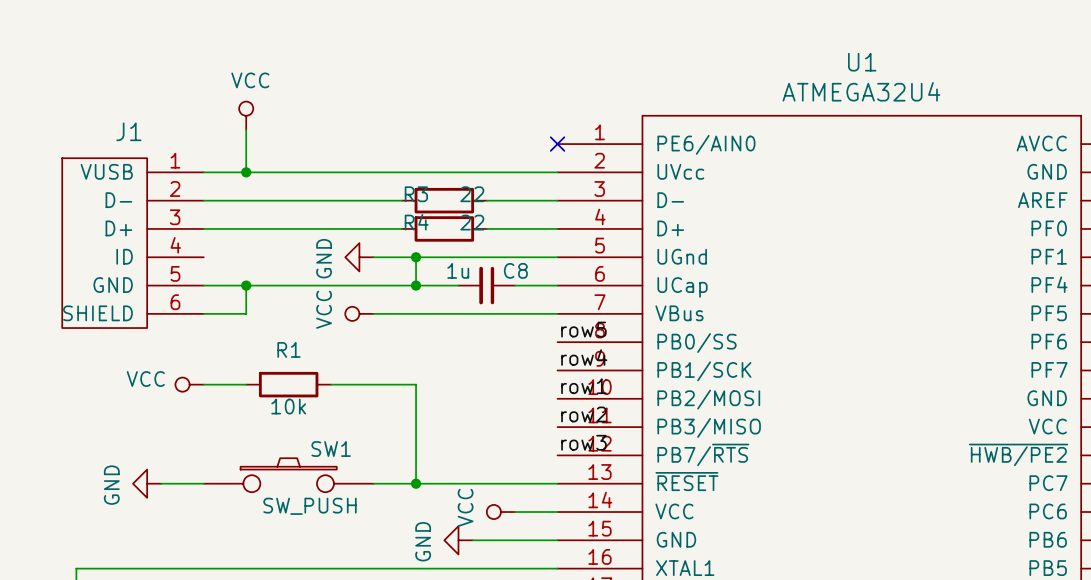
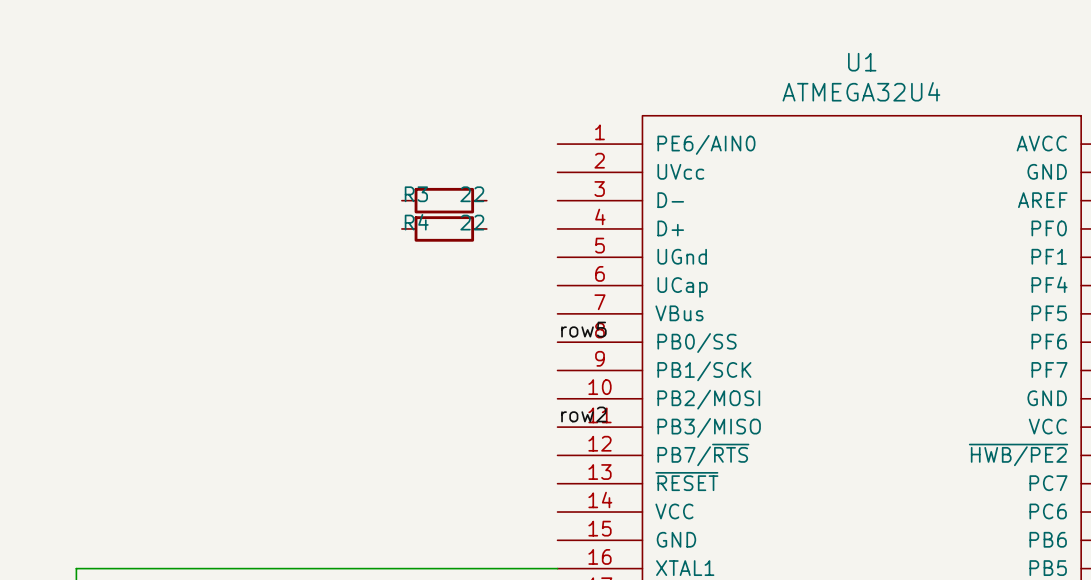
power symbol: VCC (246, 115) -> none
wire: (246, 129) (246, 172) -> none
no-connect mark: (557, 144) -> none
wire: (203, 172) (557, 172) -> none
junction: (246, 172) -> none
wire: (203, 200) (401, 200) -> none
wire: (486, 200) (557, 200) -> none
wire: (203, 228) (401, 228) -> none
wire: (486, 228) (557, 228) -> none
J1: (132, 243) -> none
power symbol: GND (359, 257) -> none
wire: (373, 257) (557, 257) -> none
wire: (416, 257) (416, 285) -> none
junction: (416, 257) -> none
wire: (203, 285) (458, 285) -> none
wire: (246, 285) (246, 313) (203, 313) -> none
junction: (246, 285) -> none
junction: (416, 285) -> none
C8: 1u (486, 285) -> none
wire: (515, 285) (557, 285) -> none
power symbol: VCC (359, 313) -> none
wire: (373, 313) (557, 313) -> none
label: row4 (584, 357) -> none
power symbol: VCC (189, 384) -> none
wire: (203, 384) (246, 384) -> none
R1: 10k (288, 384) -> none
wire: (331, 384) (416, 384) (416, 483) -> none
label: row1 (583, 386) -> none
label: row3 (583, 442) -> none
SW1: SW_PUSH (288, 475) -> none
power symbol: GND (147, 483) -> none
wire: (161, 483) (203, 483) -> none
wire: (373, 483) (557, 483) -> none
junction: (416, 483) -> none
power symbol: VCC (500, 512) -> none
wire: (515, 512) (557, 512) -> none
power symbol: GND (458, 540) -> none
wire: (472, 540) (557, 540) -> none

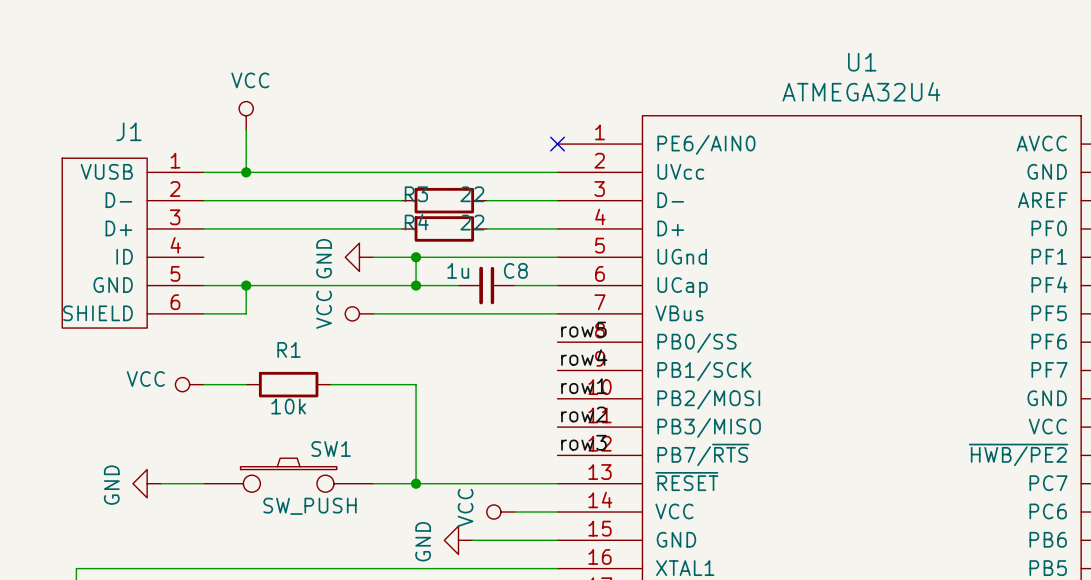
power symbol: none -> VCC (246, 115)
wire: none -> (246, 129) (246, 172)
no-connect mark: none -> (557, 144)
wire: none -> (203, 172) (557, 172)
junction: none -> (246, 172)
wire: none -> (203, 200) (401, 200)
wire: none -> (486, 200) (557, 200)
wire: none -> (203, 228) (401, 228)
wire: none -> (486, 228) (557, 228)
J1: none -> (132, 243)
power symbol: none -> GND (359, 257)
wire: none -> (373, 257) (557, 257)
wire: none -> (416, 257) (416, 285)
junction: none -> (416, 257)
wire: none -> (203, 285) (458, 285)
wire: none -> (246, 285) (246, 313) (203, 313)
junction: none -> (246, 285)
junction: none -> (416, 285)
C8: none -> 1u (486, 285)
wire: none -> (515, 285) (557, 285)
power symbol: none -> VCC (359, 313)
wire: none -> (373, 313) (557, 313)
label: none -> row4 (584, 357)
power symbol: none -> VCC (189, 384)
wire: none -> (203, 384) (246, 384)
R1: none -> 10k (288, 384)
wire: none -> (331, 384) (416, 384) (416, 483)
label: none -> row1 (583, 386)
label: none -> row3 (583, 442)
SW1: none -> SW_PUSH (288, 475)
power symbol: none -> GND (147, 483)
wire: none -> (161, 483) (203, 483)
wire: none -> (373, 483) (557, 483)
junction: none -> (416, 483)
power symbol: none -> VCC (500, 512)
wire: none -> (515, 512) (557, 512)
power symbol: none -> GND (458, 540)
wire: none -> (472, 540) (557, 540)

